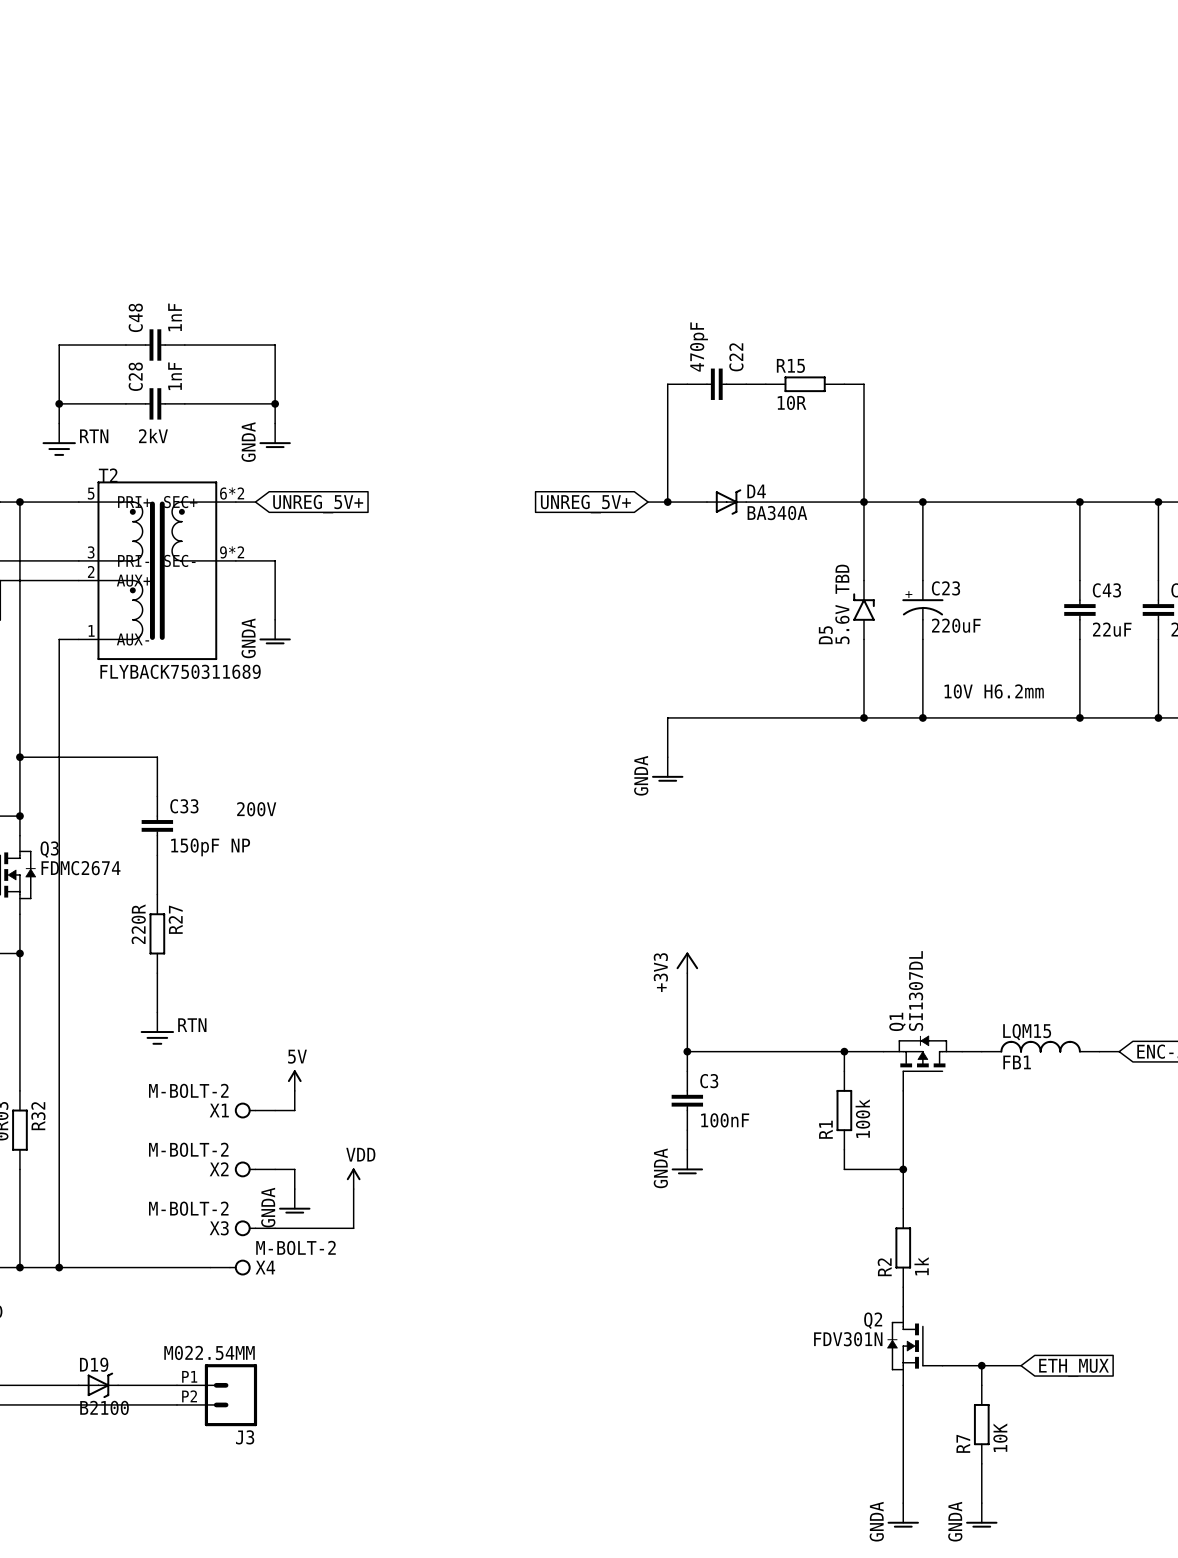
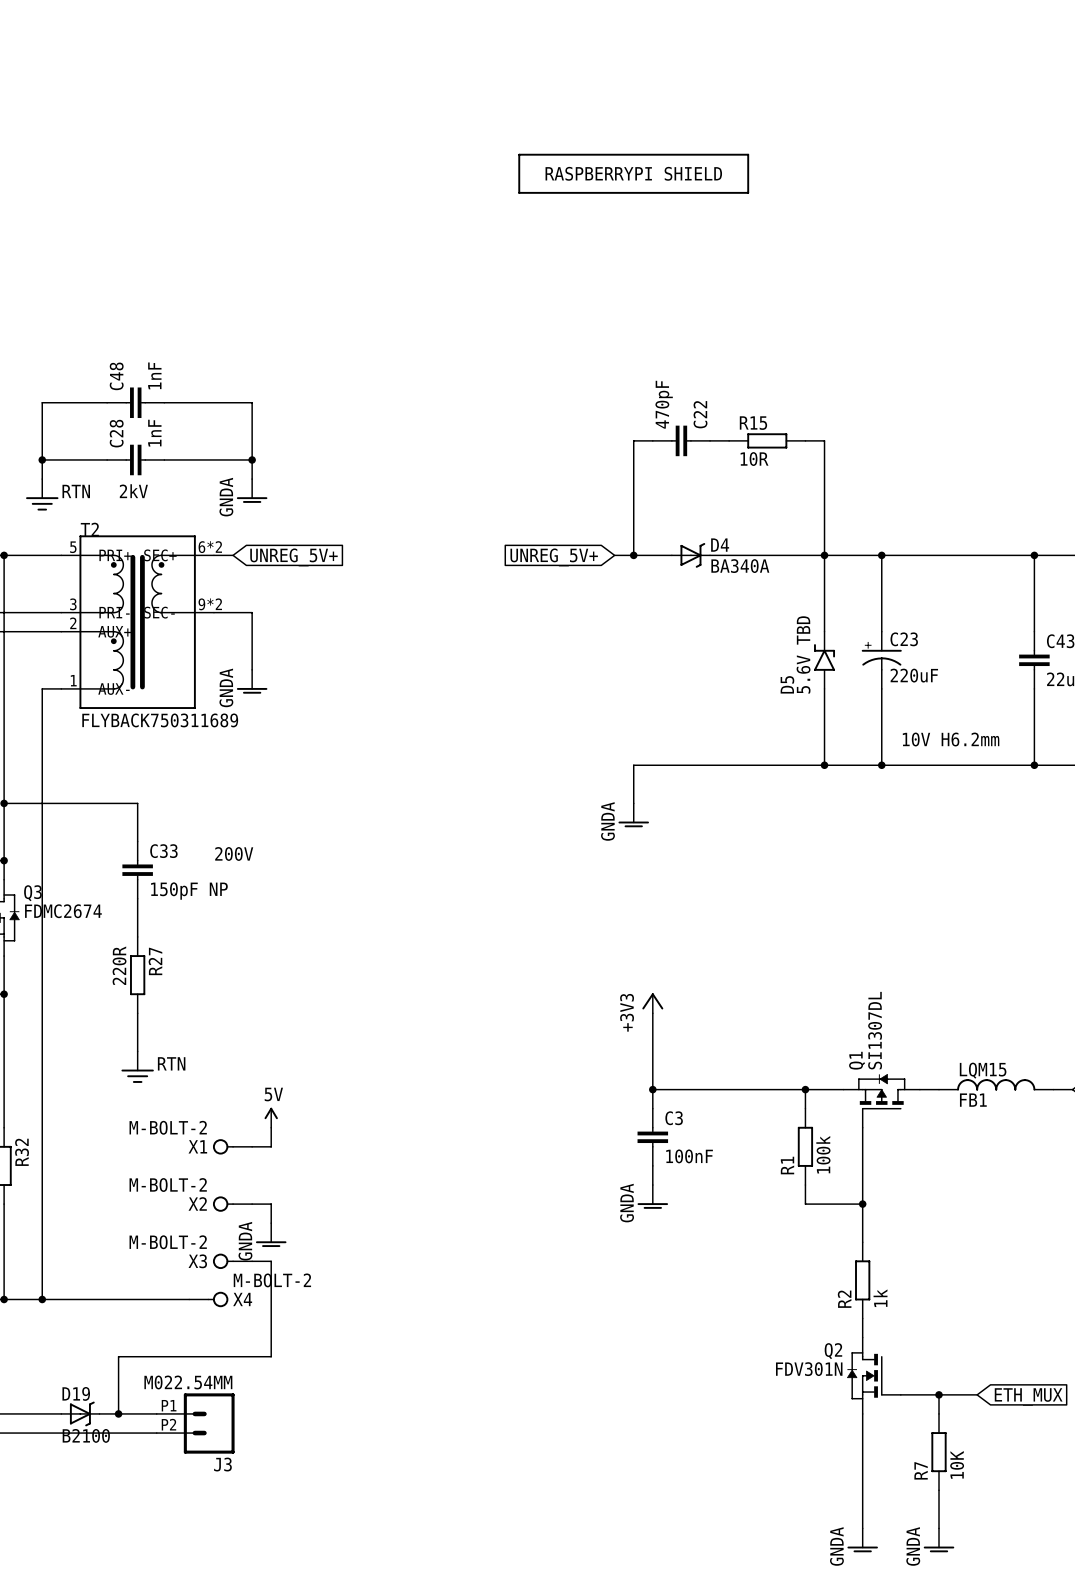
part: none -> (633, 173)
power symbol: VDD (353, 1178) -> none
wire: (353, 1189) (353, 1228) (294, 1228) -> (118, 1413) (118, 1356) (271, 1356) (271, 1261)
junction: none -> (118, 1413)

